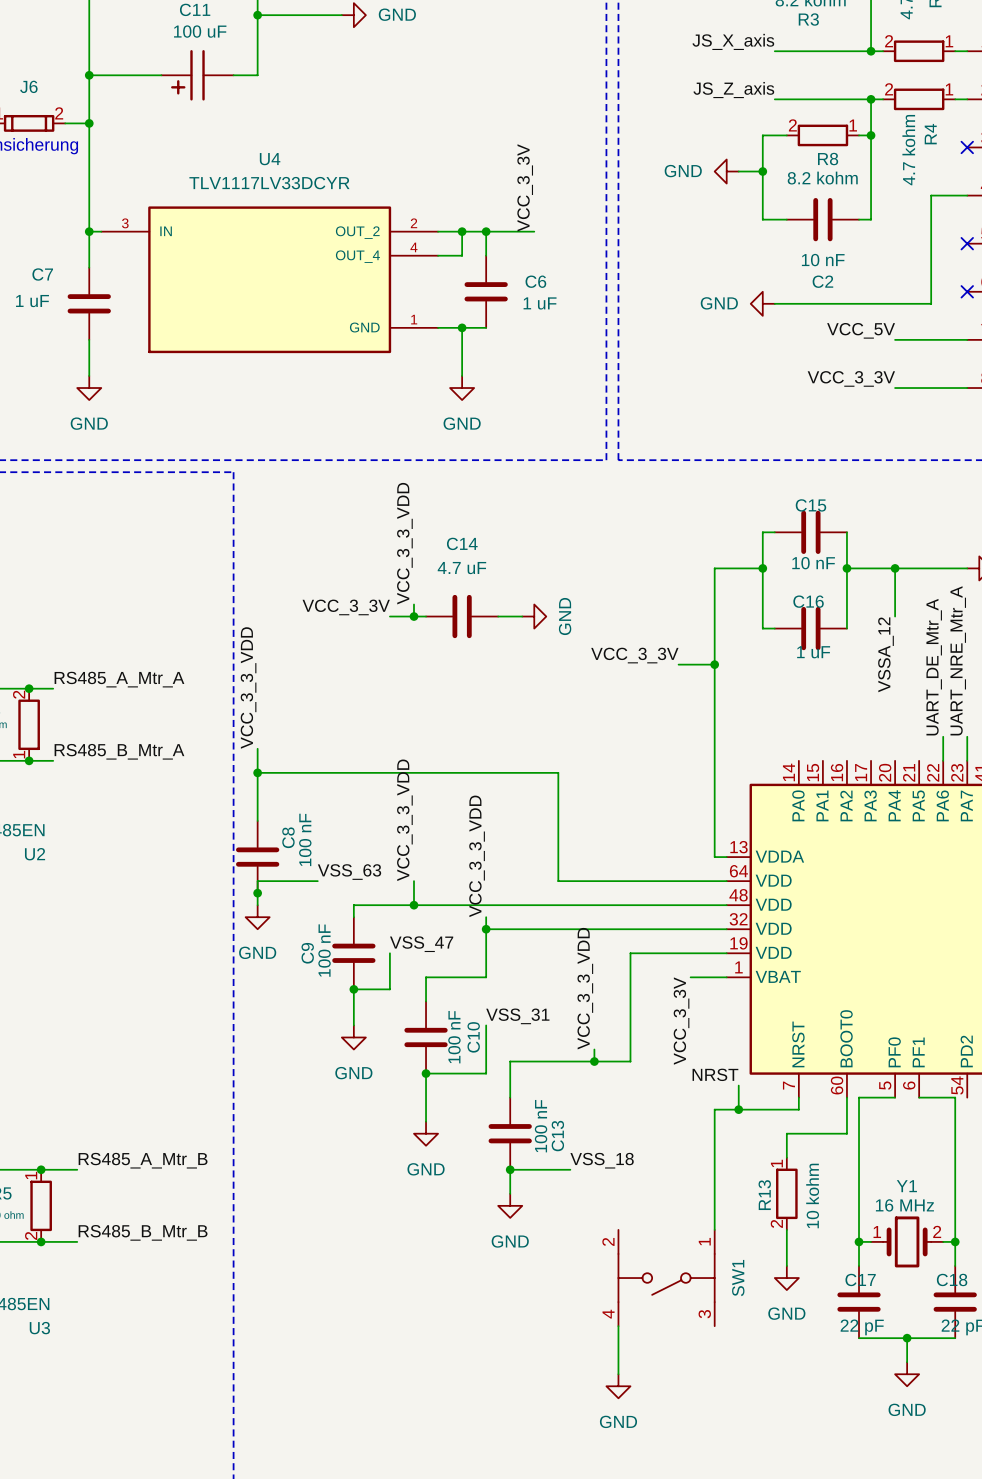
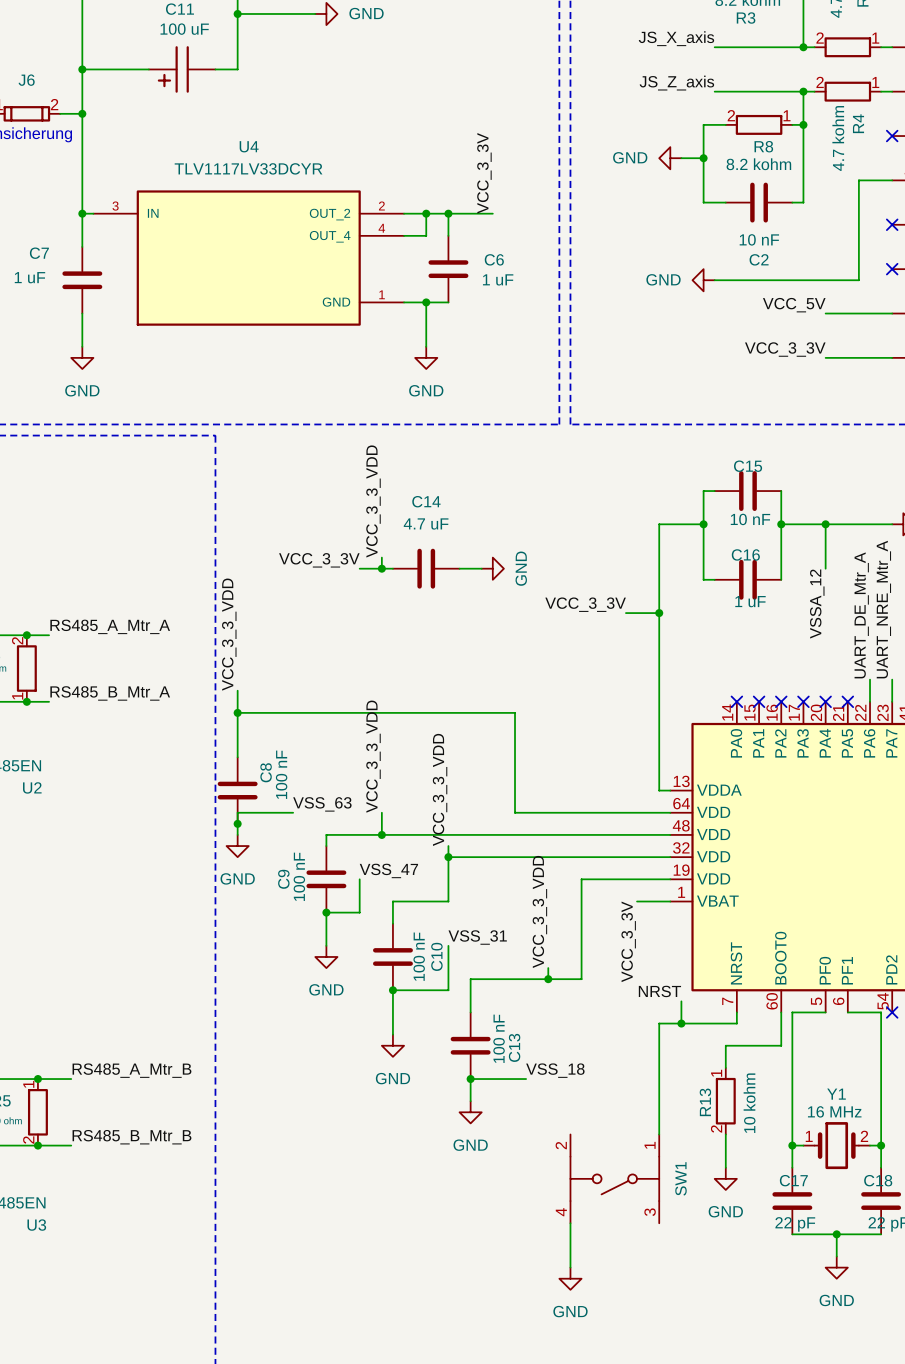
no-connect mark: none -> (736, 701)
no-connect mark: none -> (759, 701)
no-connect mark: none -> (781, 701)
no-connect mark: none -> (803, 701)
no-connect mark: none -> (825, 701)
no-connect mark: none -> (847, 701)
no-connect mark: none -> (892, 1012)

